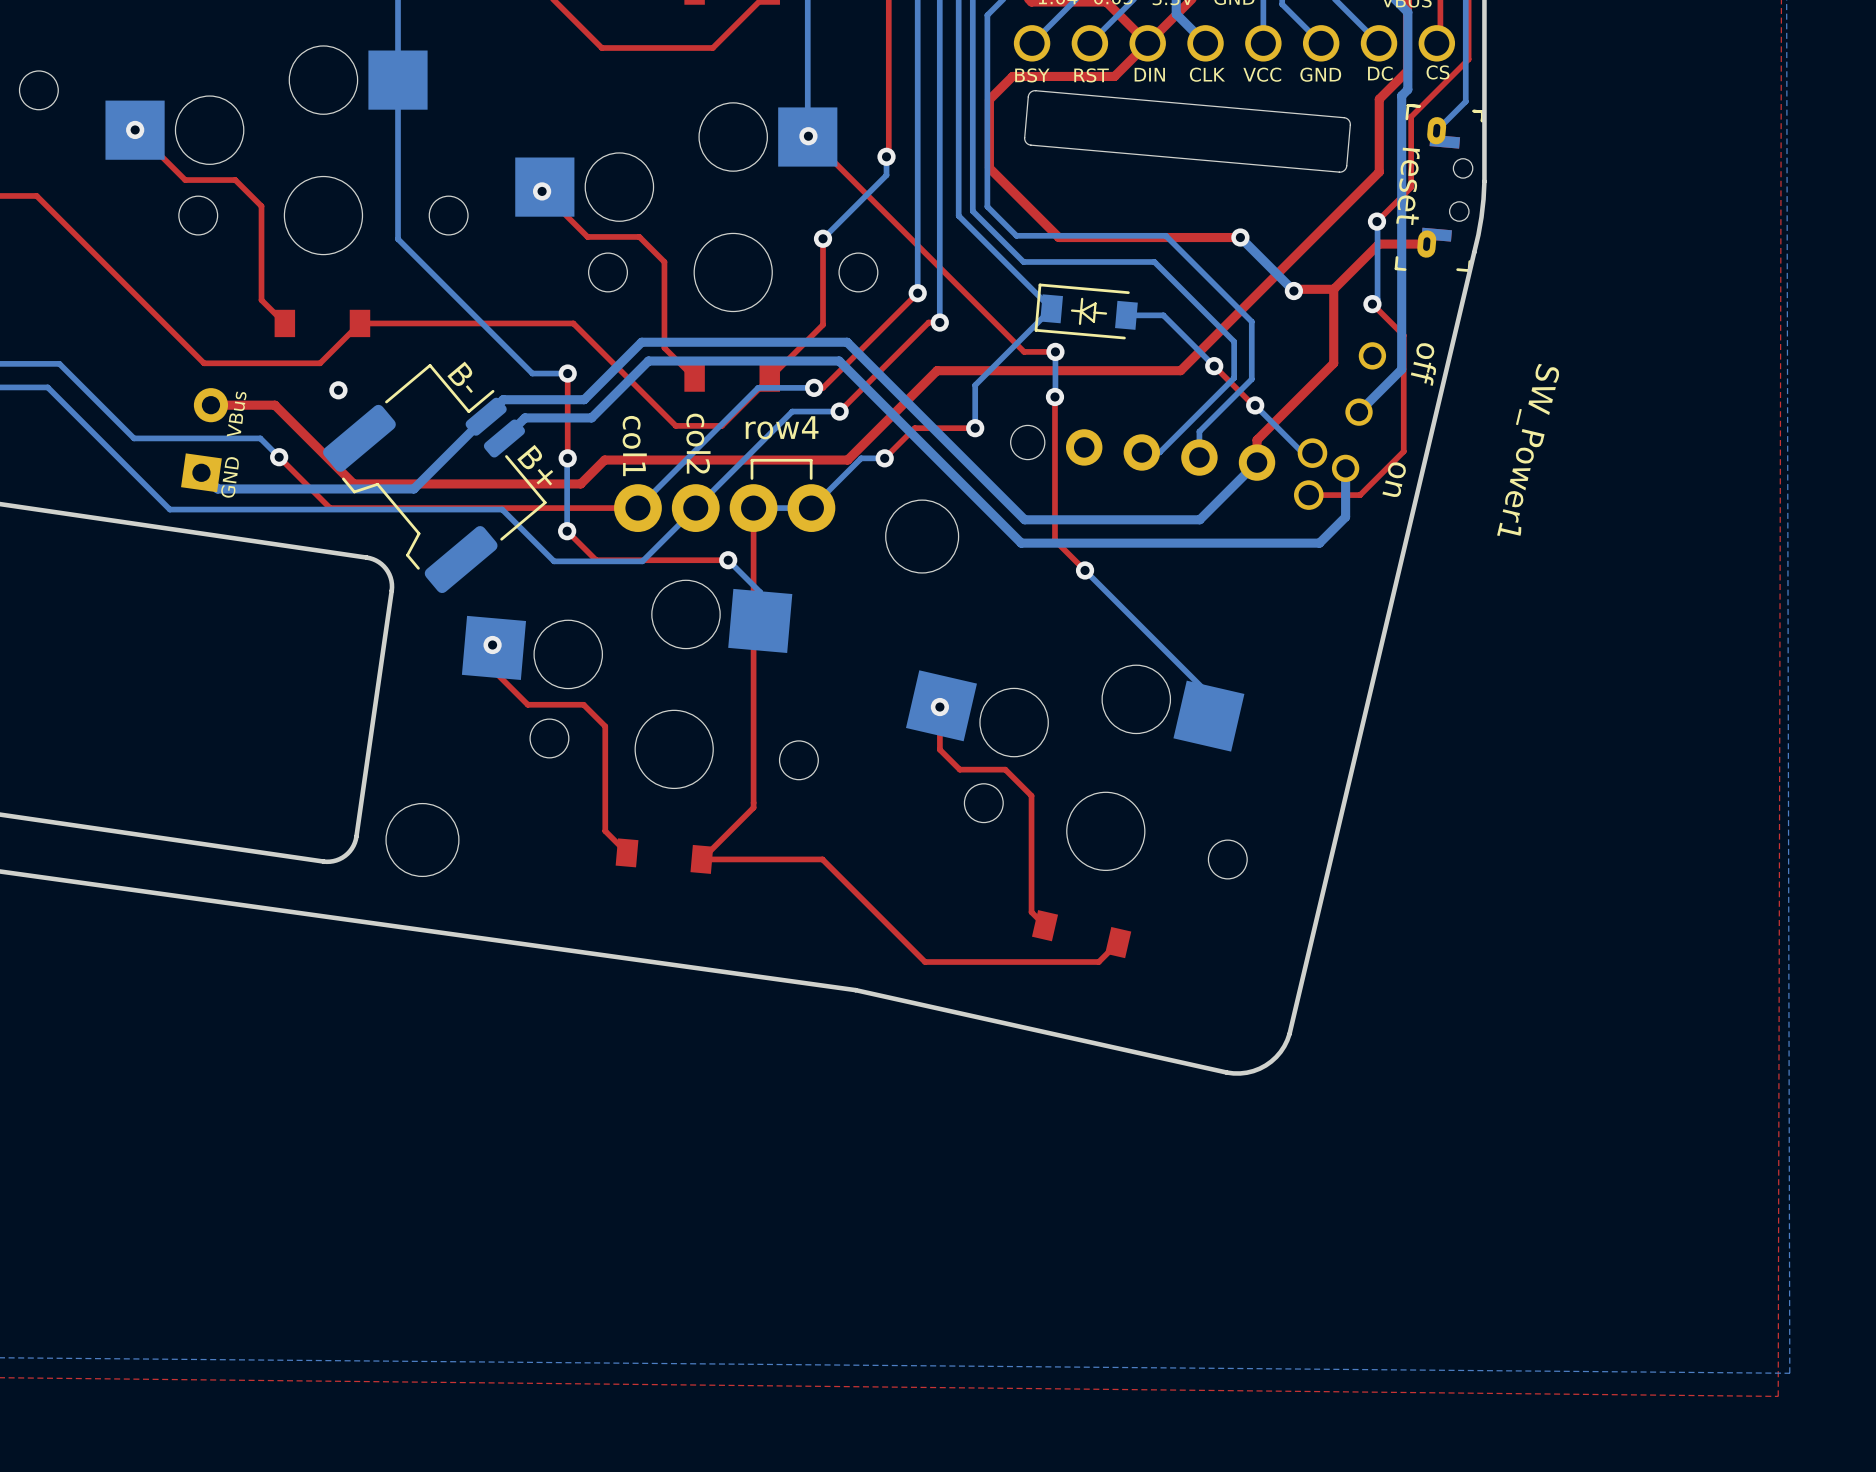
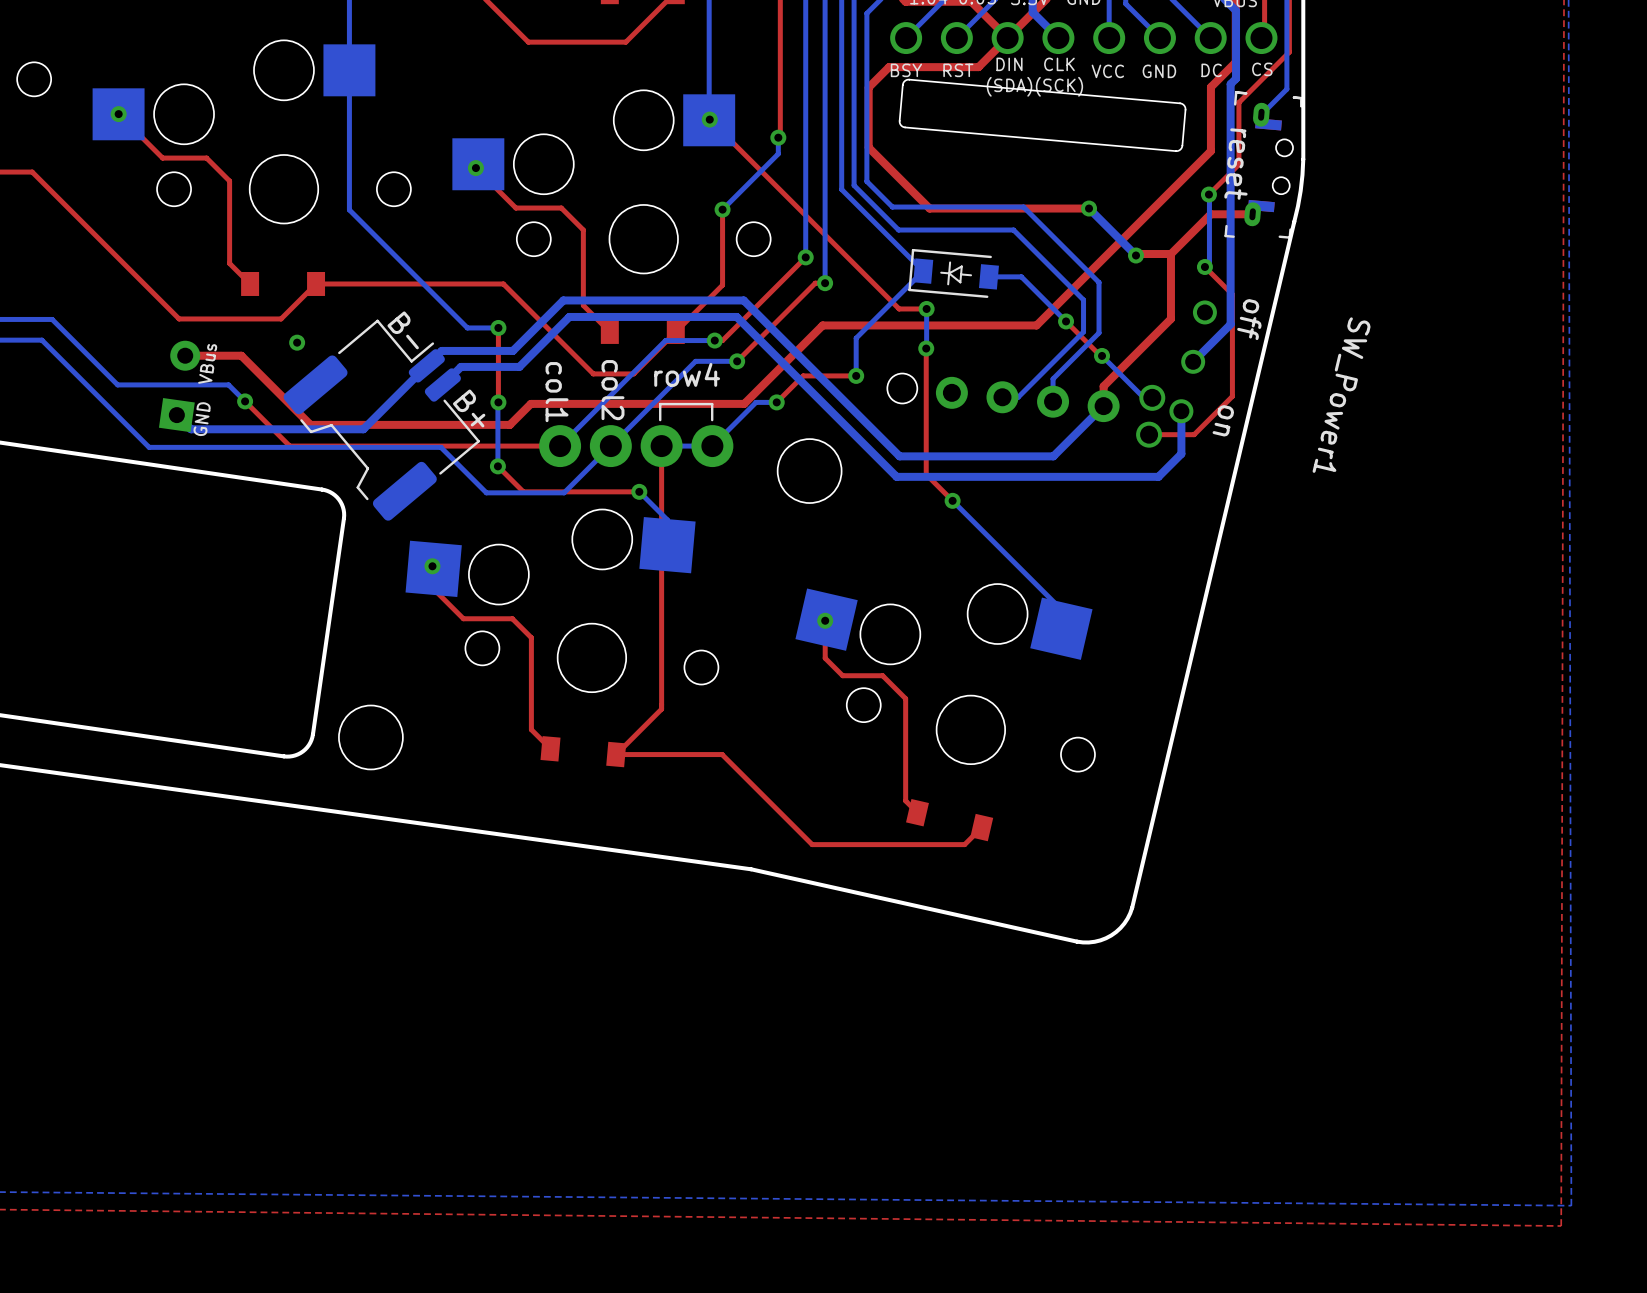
part footprint: [1013, 25, 1456, 62] -> [890, 22, 1278, 55]

